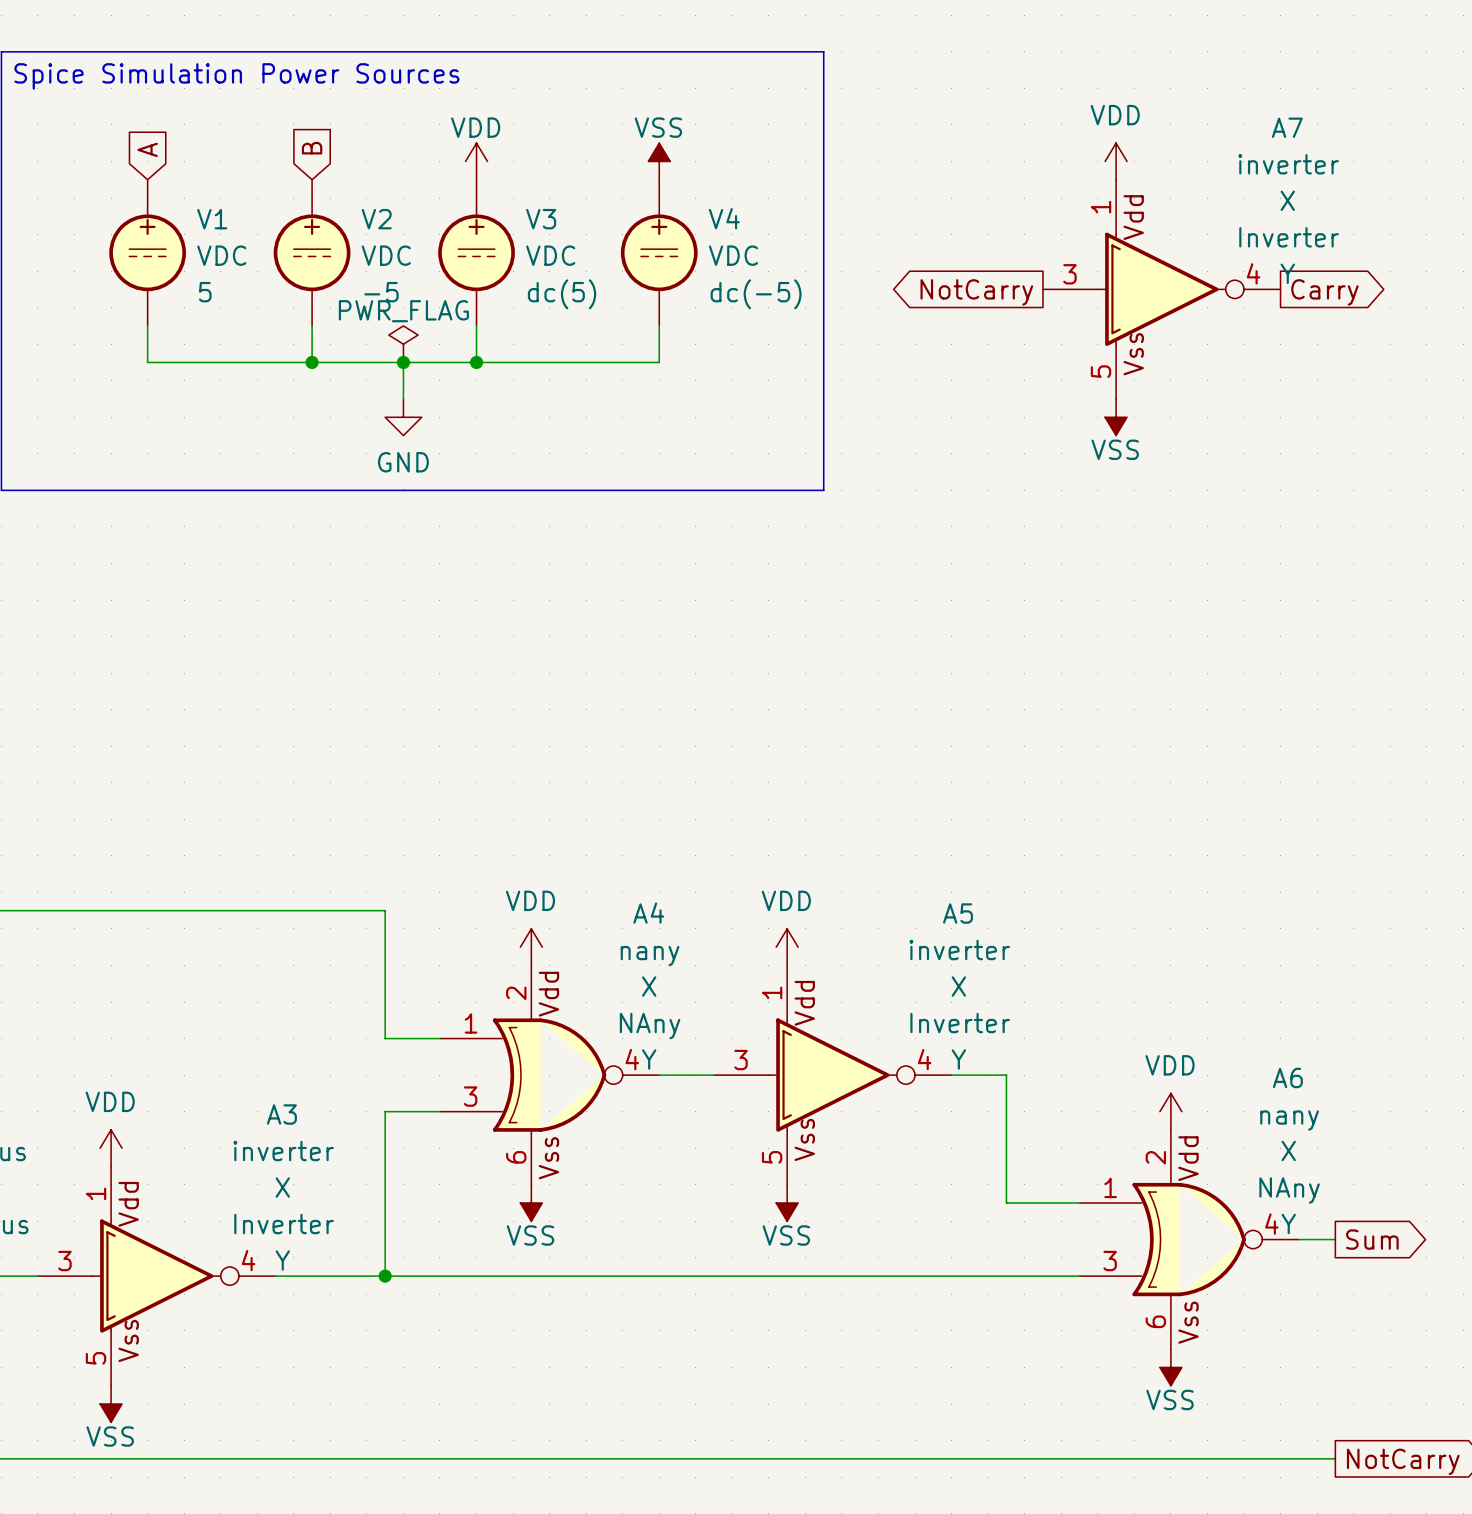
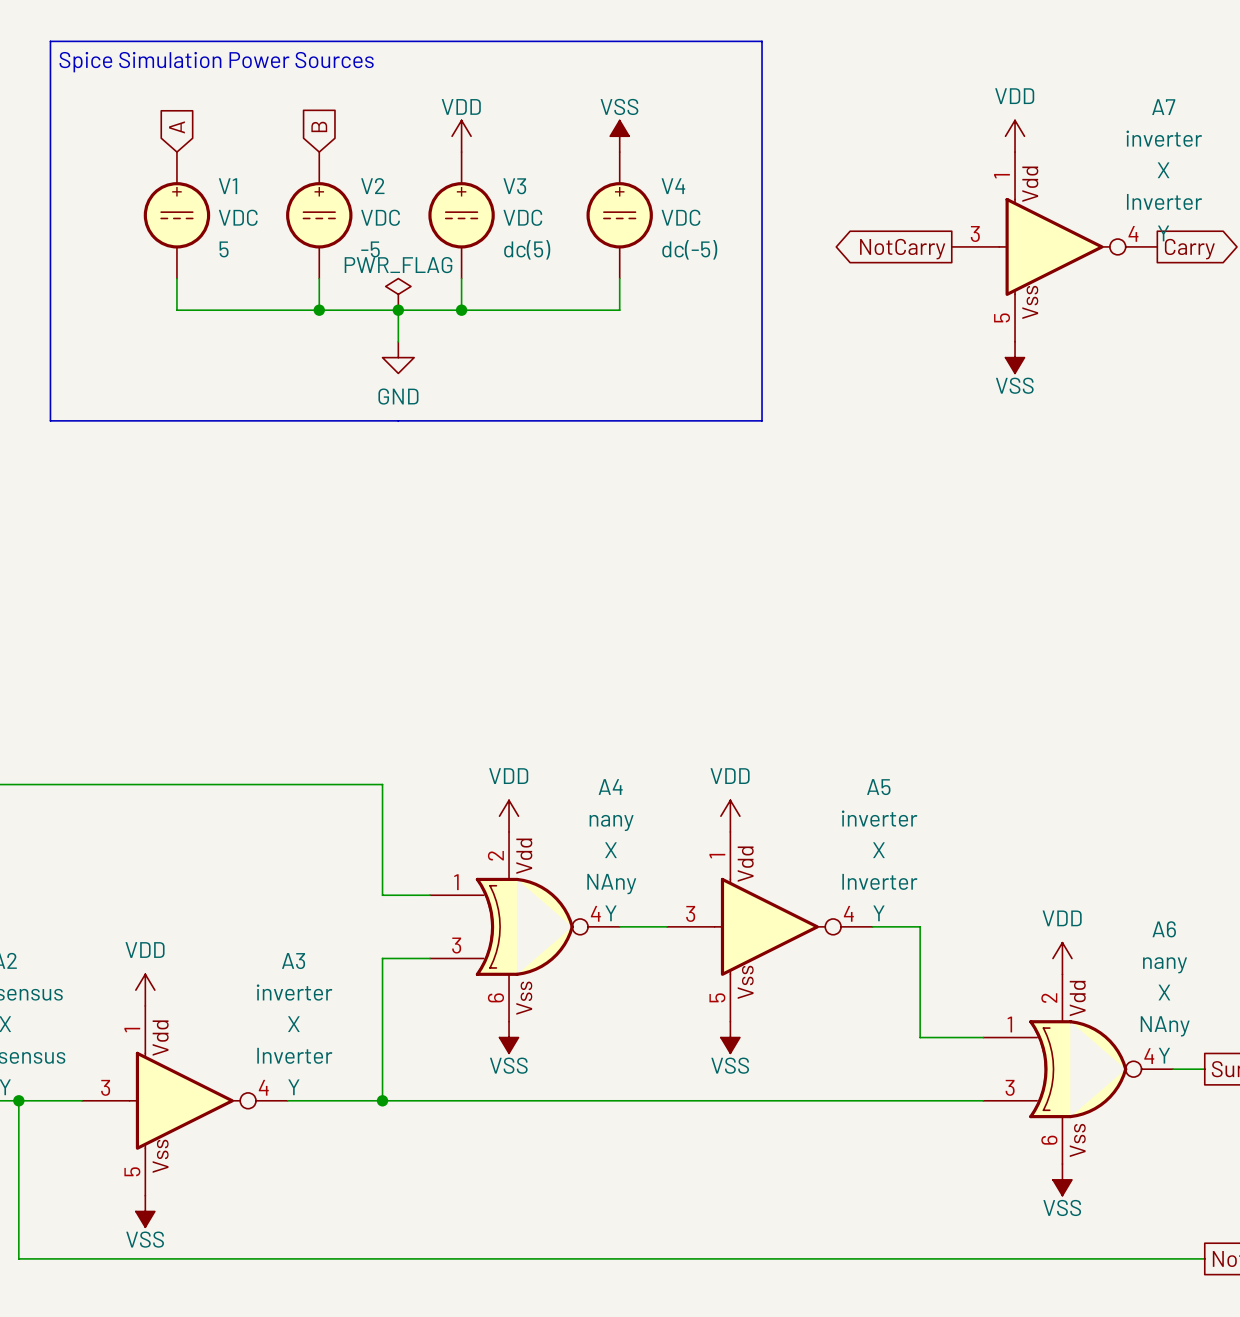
A7 symbol: [1042, 179, 1281, 400] -> [951, 152, 1158, 342]
A5 symbol: [714, 965, 952, 1185] -> [667, 831, 873, 1022]
A3 symbol: [37, 1166, 276, 1386] -> [82, 1005, 288, 1196]

